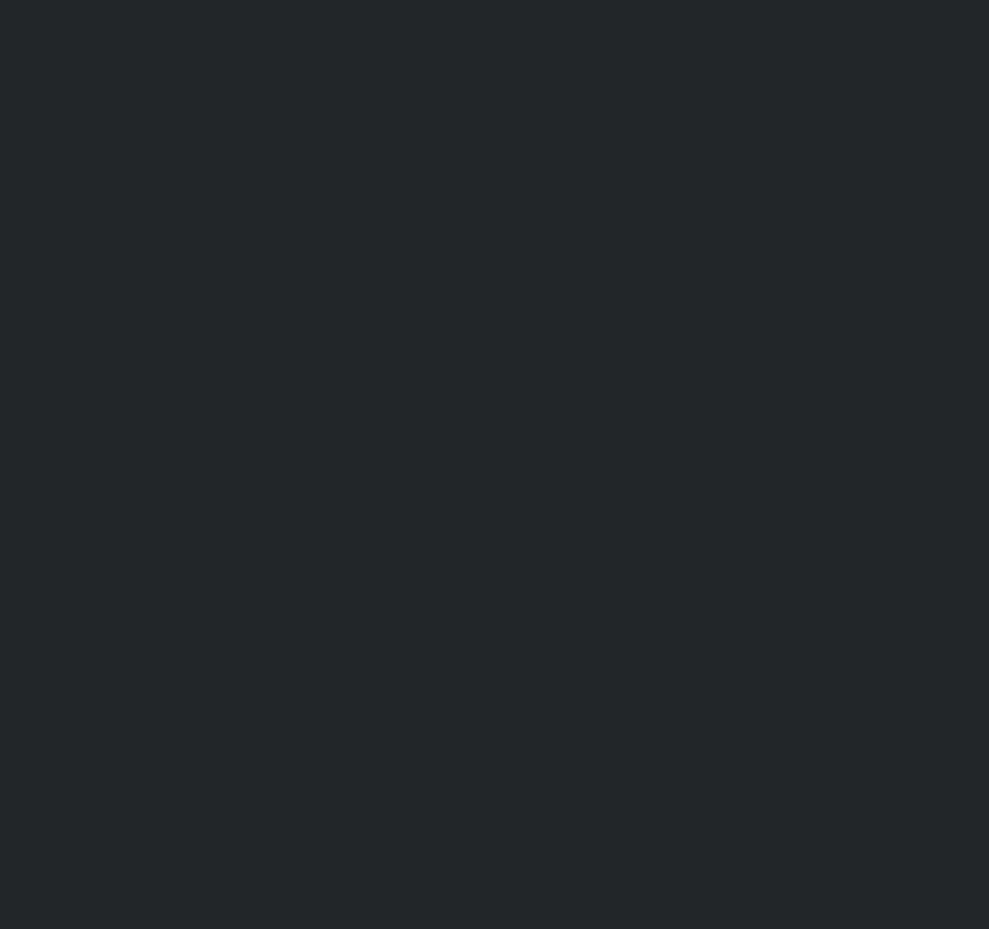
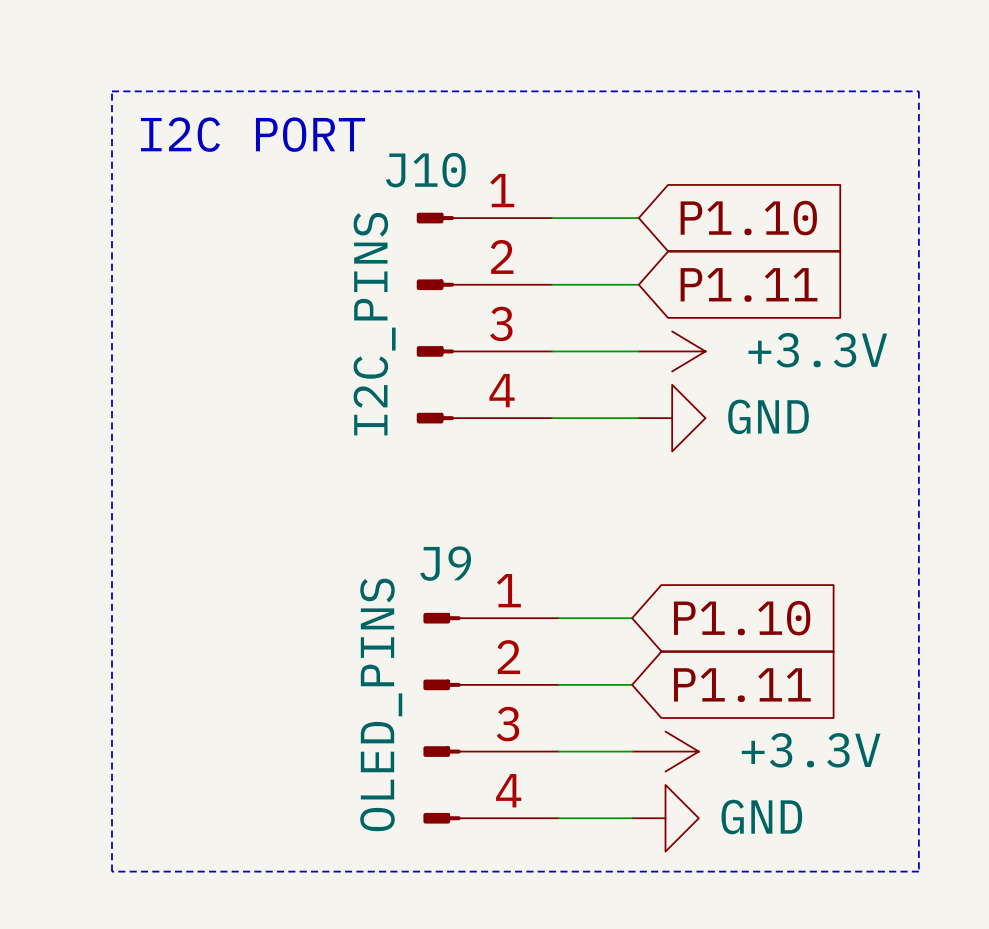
line: none -> (111, 91) (918, 91) (918, 871) (111, 871) (111, 91)
text: none -> I2C PORT (253, 134)
wire: none -> (552, 218) (638, 218)
global label: none -> P1.10 (748, 218)
wire: none -> (552, 284) (638, 284)
global label: none -> P1.11 (749, 284)
J10: none -> I2C_PINS (484, 318)
wire: none -> (552, 351) (638, 351)
power symbol: none -> +3.3V (672, 351)
wire: none -> (552, 418) (638, 418)
power symbol: none -> GND (672, 418)
wire: none -> (558, 618) (632, 618)
global label: none -> P1.10 (742, 618)
wire: none -> (558, 684) (632, 684)
global label: none -> P1.11 (742, 685)
J9: none -> OLED_PINS (491, 718)
wire: none -> (558, 751) (632, 751)
power symbol: none -> +3.3V (665, 751)
wire: none -> (558, 818) (632, 818)
power symbol: none -> GND (665, 818)

